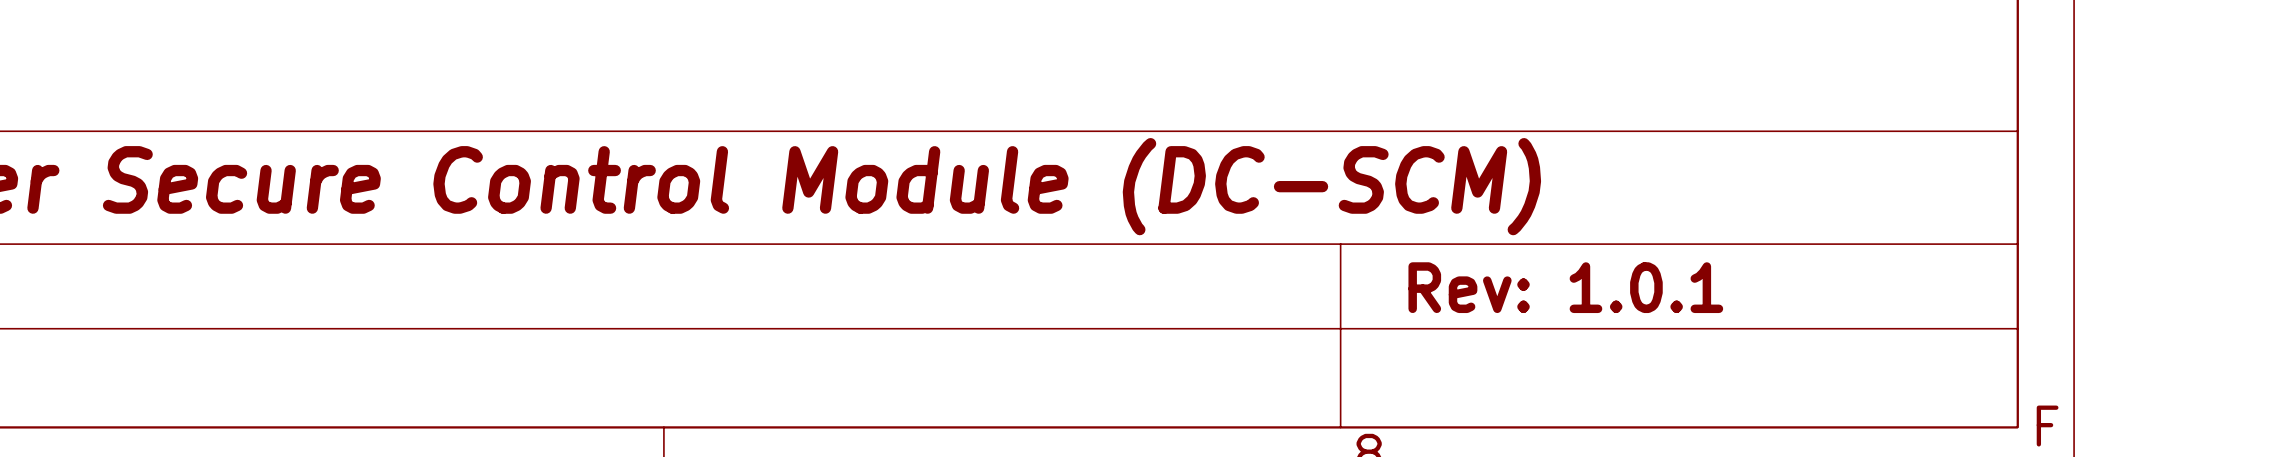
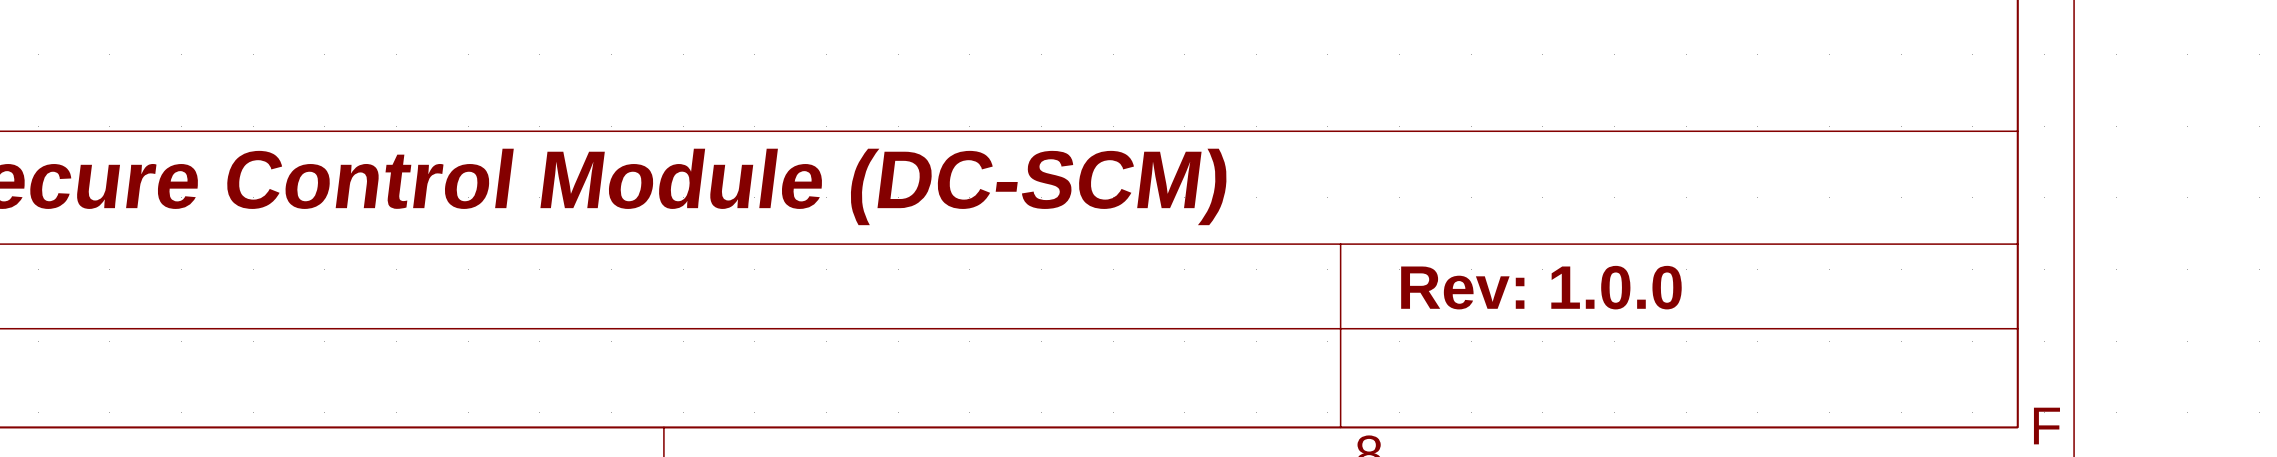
title block: Rev: 1.0.1 (1565, 287) -> Rev: 1.0.0 (1541, 287)

